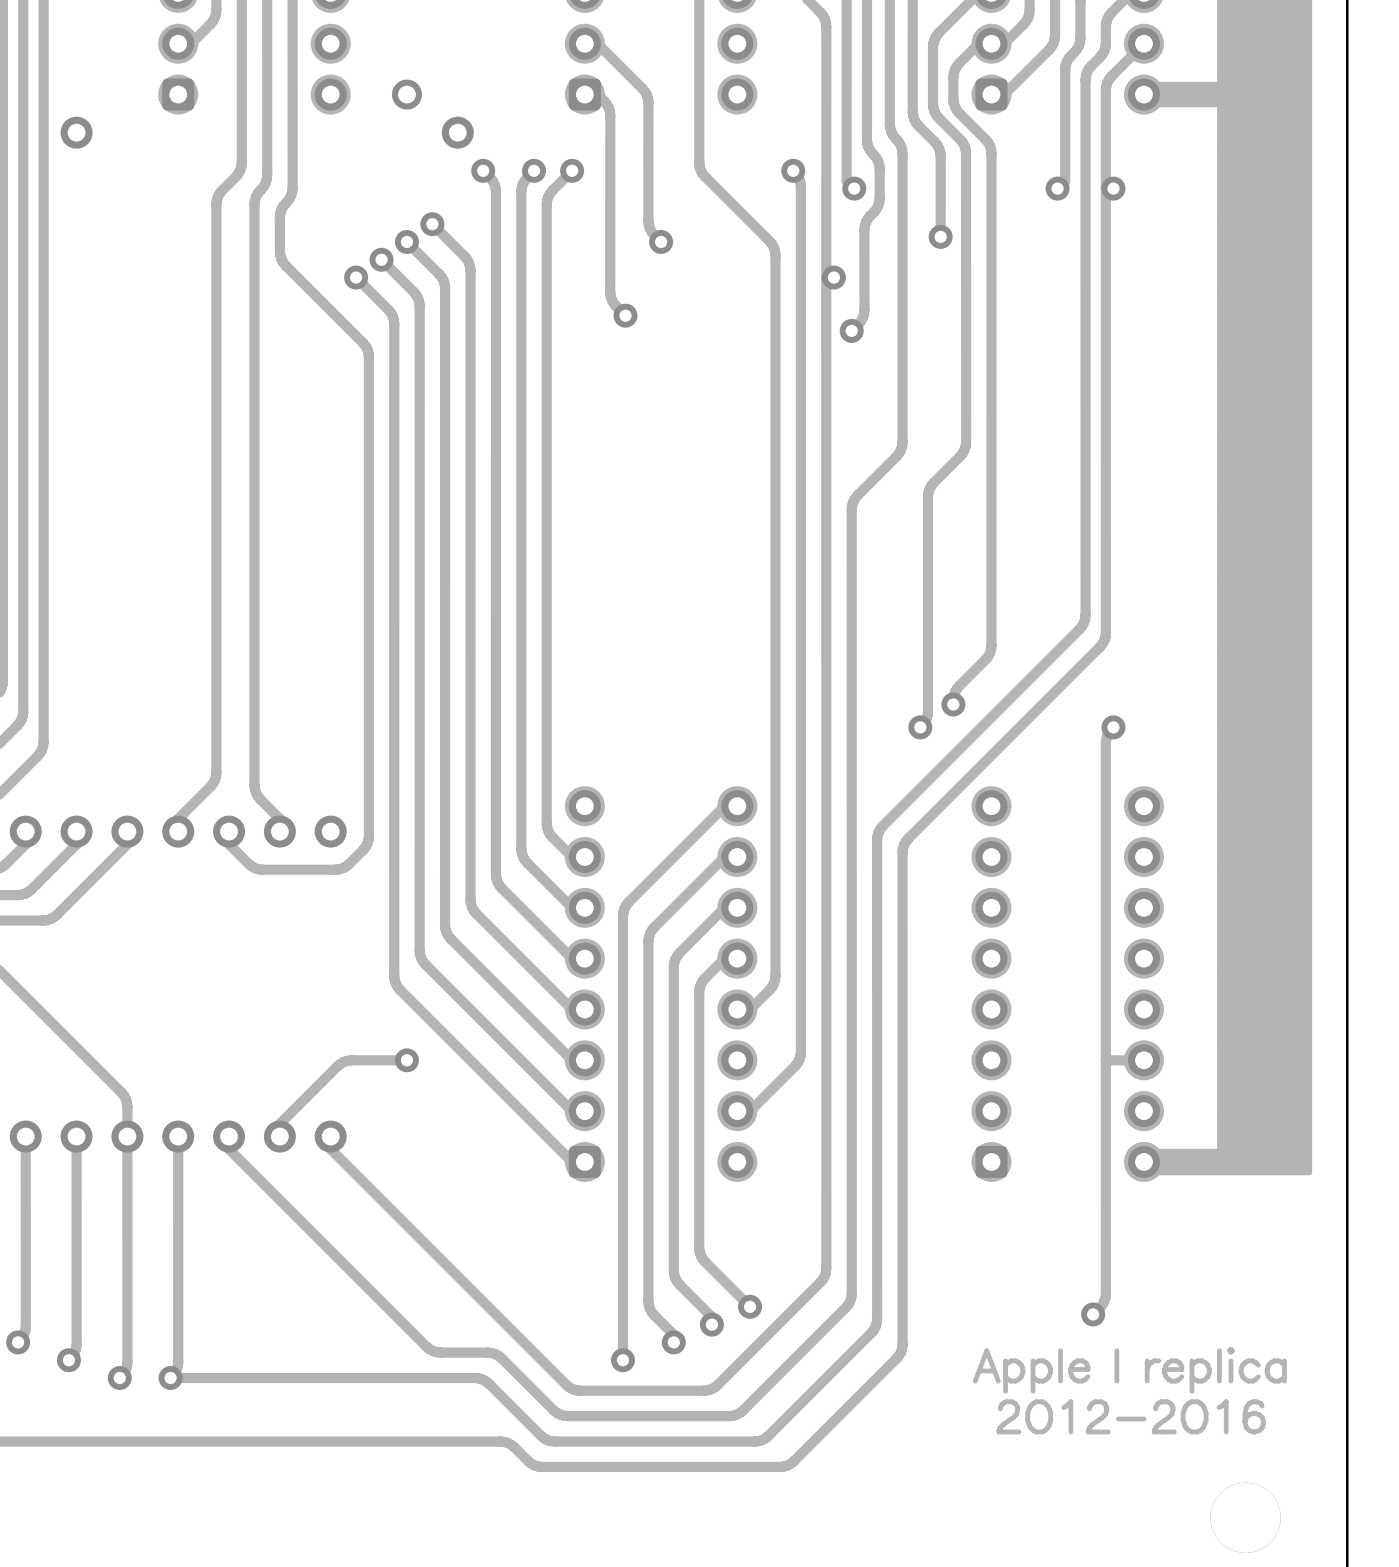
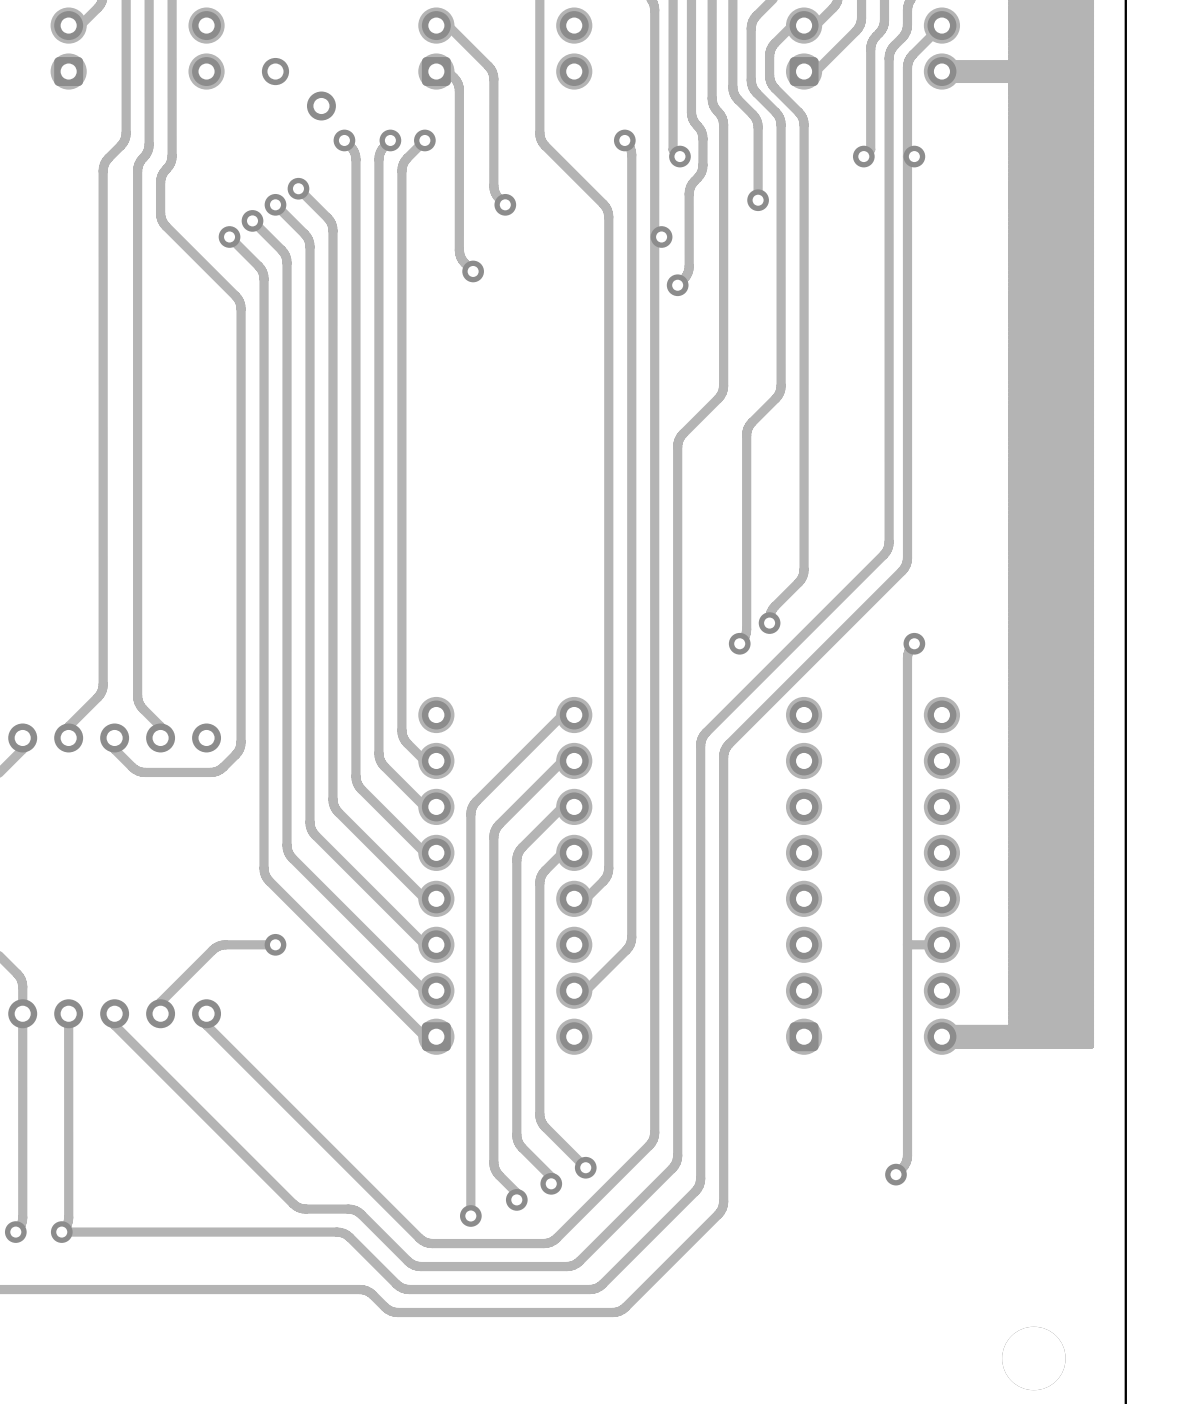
track: (1230, 1349) (1229, 1350) (1230, 1352) (1232, 1350) (1230, 1349) -> none
track: (1060, 1350) (1060, 1381) -> none
track: (1116, 1350) (1116, 1381) -> none
track: (1219, 1350) (1219, 1381) -> none
track: (1005, 1360) (1005, 1391) -> none
track: (1033, 1360) (1033, 1391) -> none
track: (1147, 1360) (1147, 1381) -> none
track: (1158, 1360) (1151, 1362) (1147, 1369) -> none
track: (1191, 1360) (1191, 1391) -> none
track: (1230, 1360) (1230, 1381) -> none
track: (1284, 1360) (1284, 1381) -> none
track: (1005, 1365) (1011, 1360) (1015, 1360) (1021, 1365) (1022, 1369) (1021, 1376) (1015, 1381) (1011, 1381) (1005, 1376) -> none
track: (1033, 1365) (1038, 1360) (1043, 1360) (1048, 1365) (1050, 1369) (1048, 1376) (1043, 1381) (1038, 1381) (1033, 1376) -> none
track: (1191, 1365) (1197, 1360) (1202, 1360) (1207, 1365) (1209, 1369) (1207, 1376) (1202, 1381) (1197, 1381) (1191, 1376) -> none
track: (1258, 1365) (1252, 1360) (1248, 1360) (1242, 1365) (1241, 1369) (1242, 1376) (1248, 1381) (1252, 1381) (1258, 1376) -> none
track: (1284, 1365) (1278, 1360) (1274, 1360) (1268, 1365) (1267, 1369) (1268, 1376) (1274, 1381) (1278, 1381) (1284, 1376) -> none
track: (1070, 1369) (1087, 1369) (1087, 1366) (1085, 1362) (1077, 1360) (1072, 1365) (1070, 1369) -> none
track: (1070, 1369) (1072, 1376) (1077, 1381) (1082, 1381) (1087, 1376) -> none
track: (1164, 1369) (1181, 1369) (1181, 1366) (1178, 1362) (1171, 1360) (1165, 1365) (1164, 1369) -> none
track: (1164, 1369) (1165, 1376) (1171, 1381) (1176, 1381) (1181, 1376) -> none
track: (994, 1370) (979, 1370) -> none
track: (998, 1381) (986, 1350) (975, 1381) -> none
track: (1042, 1401) (1033, 1403) (1027, 1413) (1029, 1424) (1036, 1431) (1045, 1430) (1050, 1420) (1049, 1408) (1042, 1401) -> none
track: (1197, 1401) (1188, 1403) (1183, 1413) (1184, 1424) (1191, 1431) (1200, 1430) (1206, 1420) (1204, 1408) (1197, 1401) -> none
track: (1262, 1406) (1256, 1401) (1249, 1403) (1246, 1407) (1244, 1421) -> none
track: (1063, 1407) (1070, 1401) (1070, 1431) -> none
track: (1219, 1407) (1226, 1401) (1226, 1431) -> none
track: (1000, 1408) (1001, 1404) (1006, 1401) (1011, 1401) (1017, 1407) (1016, 1414) (1000, 1427) (998, 1431) (1019, 1431) -> none
track: (1089, 1408) (1091, 1404) (1095, 1401) (1103, 1403) (1106, 1407) (1105, 1414) (1092, 1424) (1088, 1431) (1108, 1431) -> none
track: (1155, 1408) (1157, 1404) (1161, 1401) (1170, 1403) (1172, 1407) (1171, 1414) (1158, 1424) (1154, 1431) (1174, 1431) -> none
track: (1144, 1419) (1118, 1419) -> none
track: (1244, 1421) (1249, 1414) (1254, 1413) (1262, 1417) (1263, 1423) (1259, 1430) (1253, 1431) (1246, 1427) (1244, 1421) -> none

